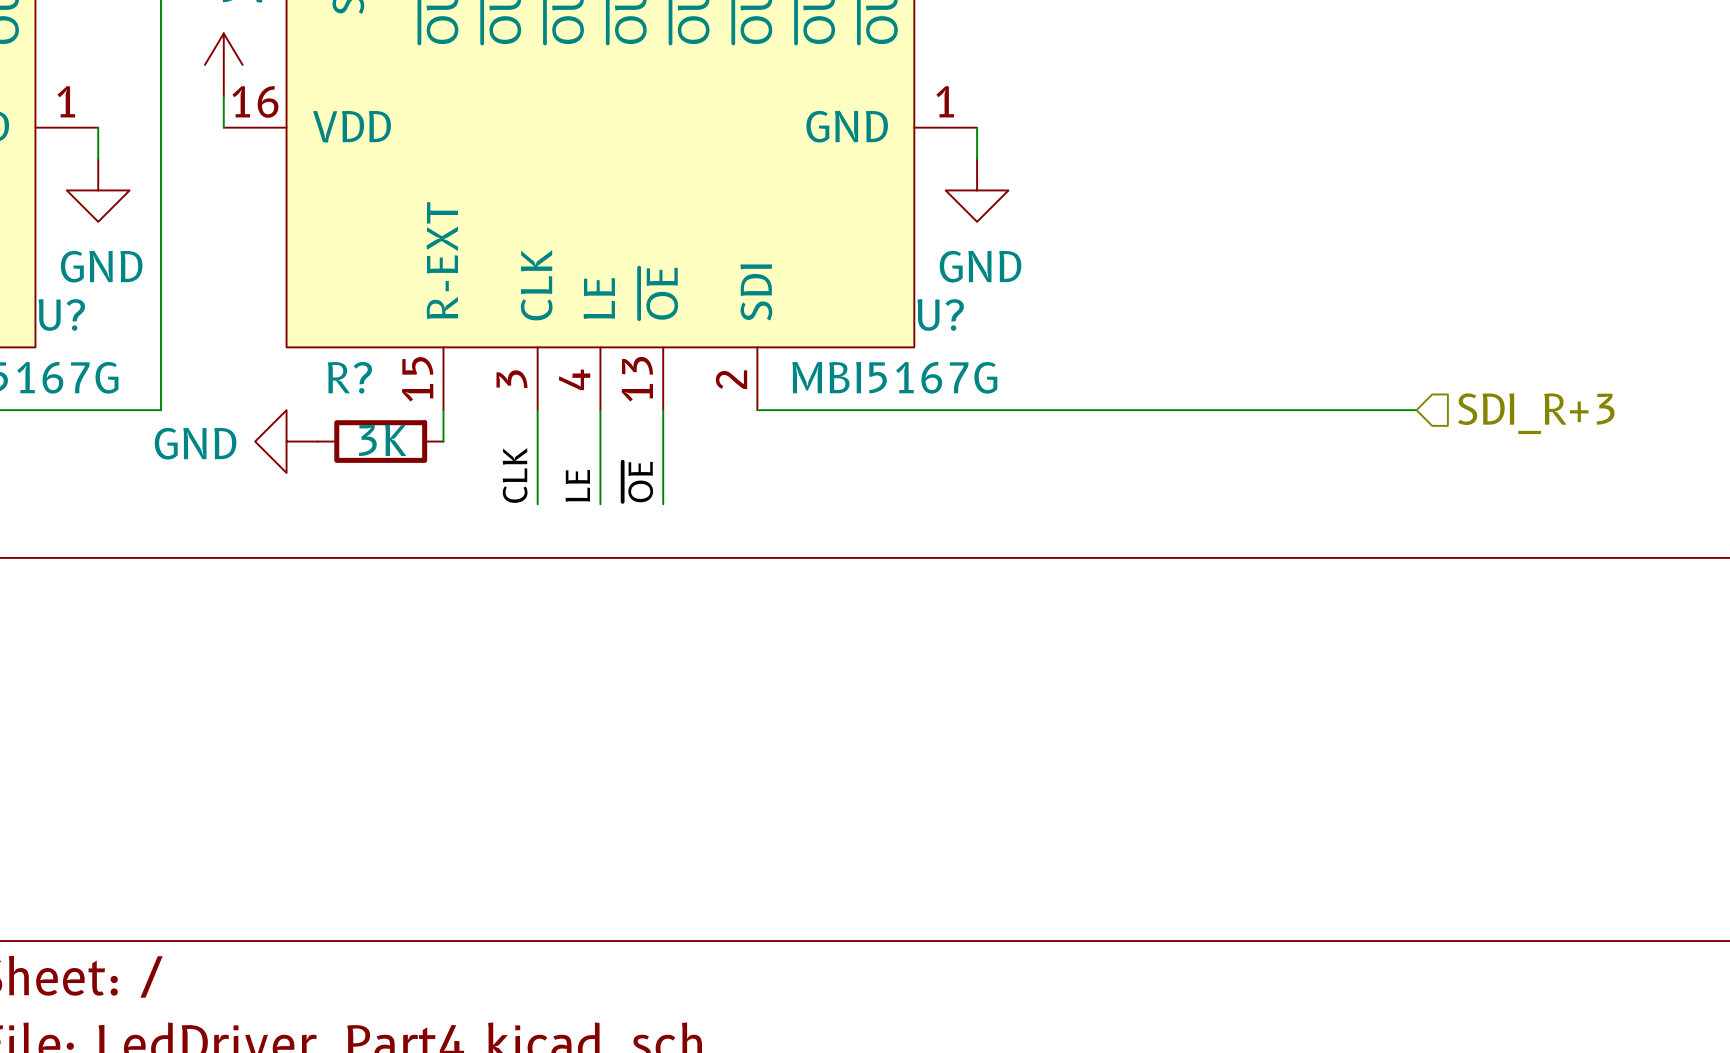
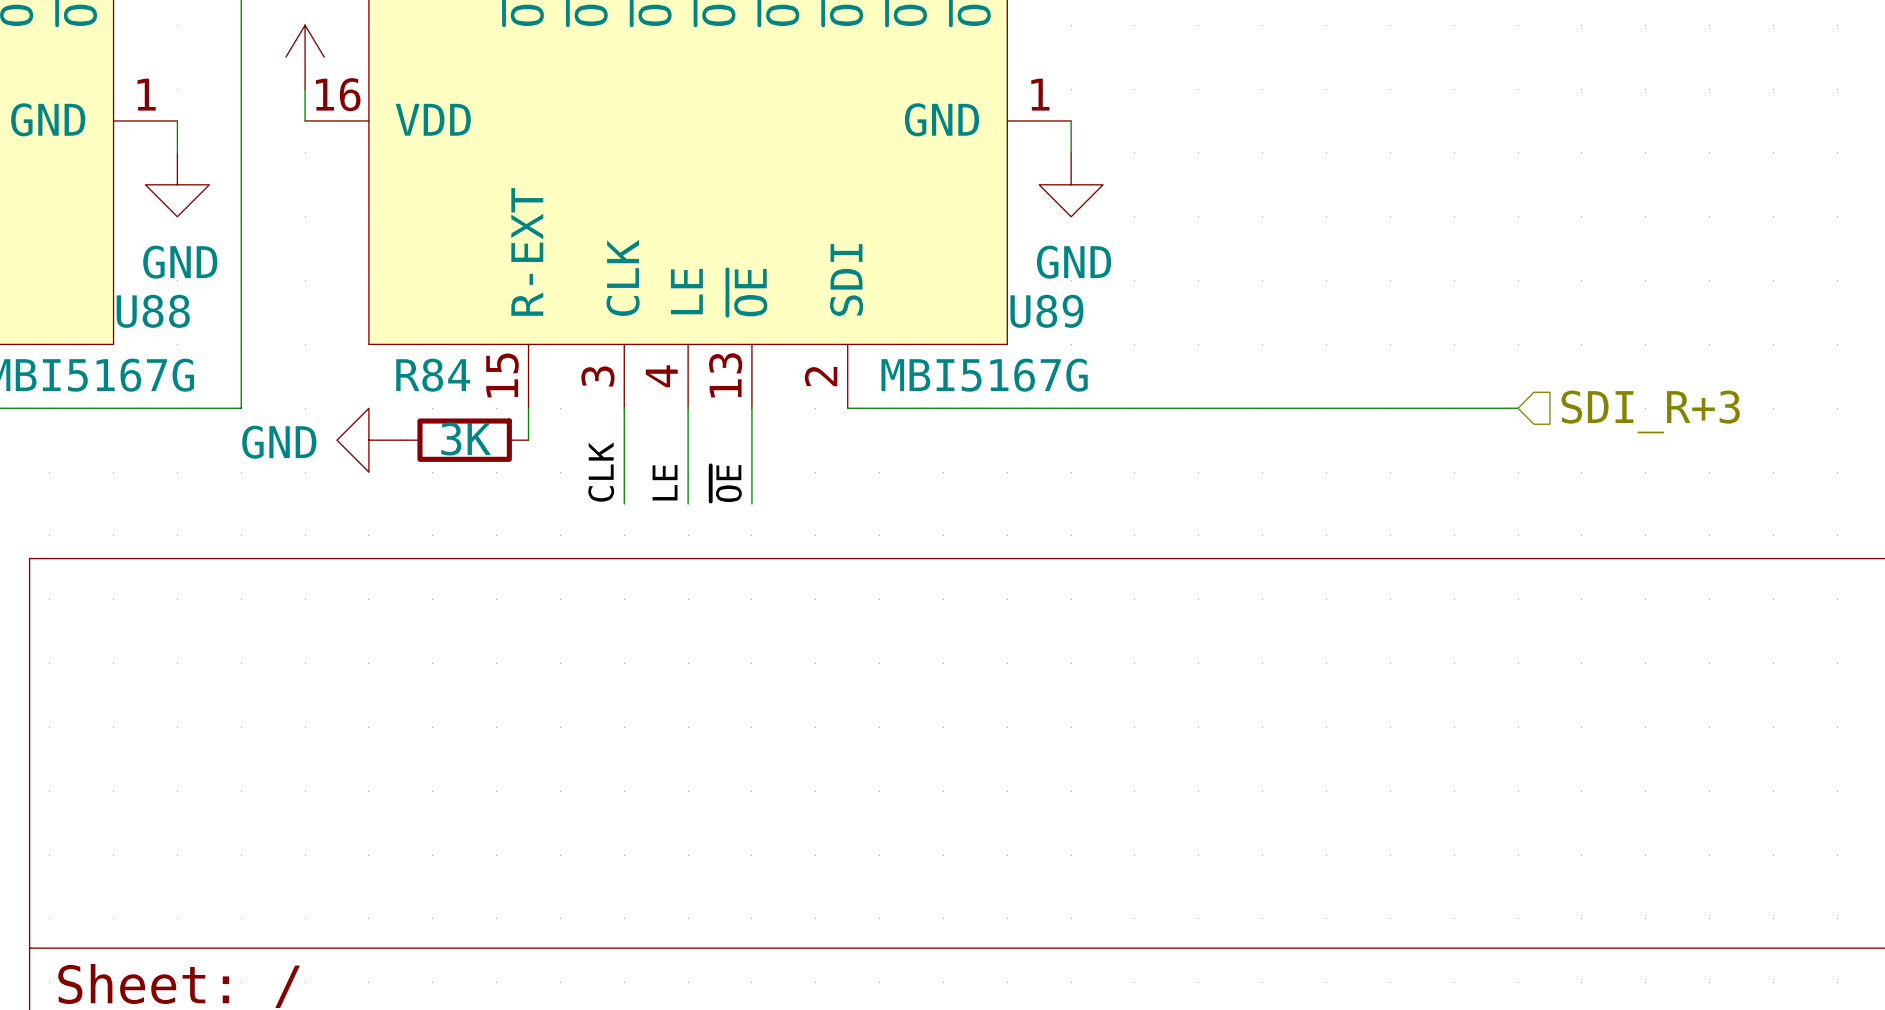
U? name: U? (61, 314) -> U88 (153, 311)
U? name: U? (940, 314) -> U89 (1046, 311)
R? name: R? (349, 377) -> R84 (433, 375)

